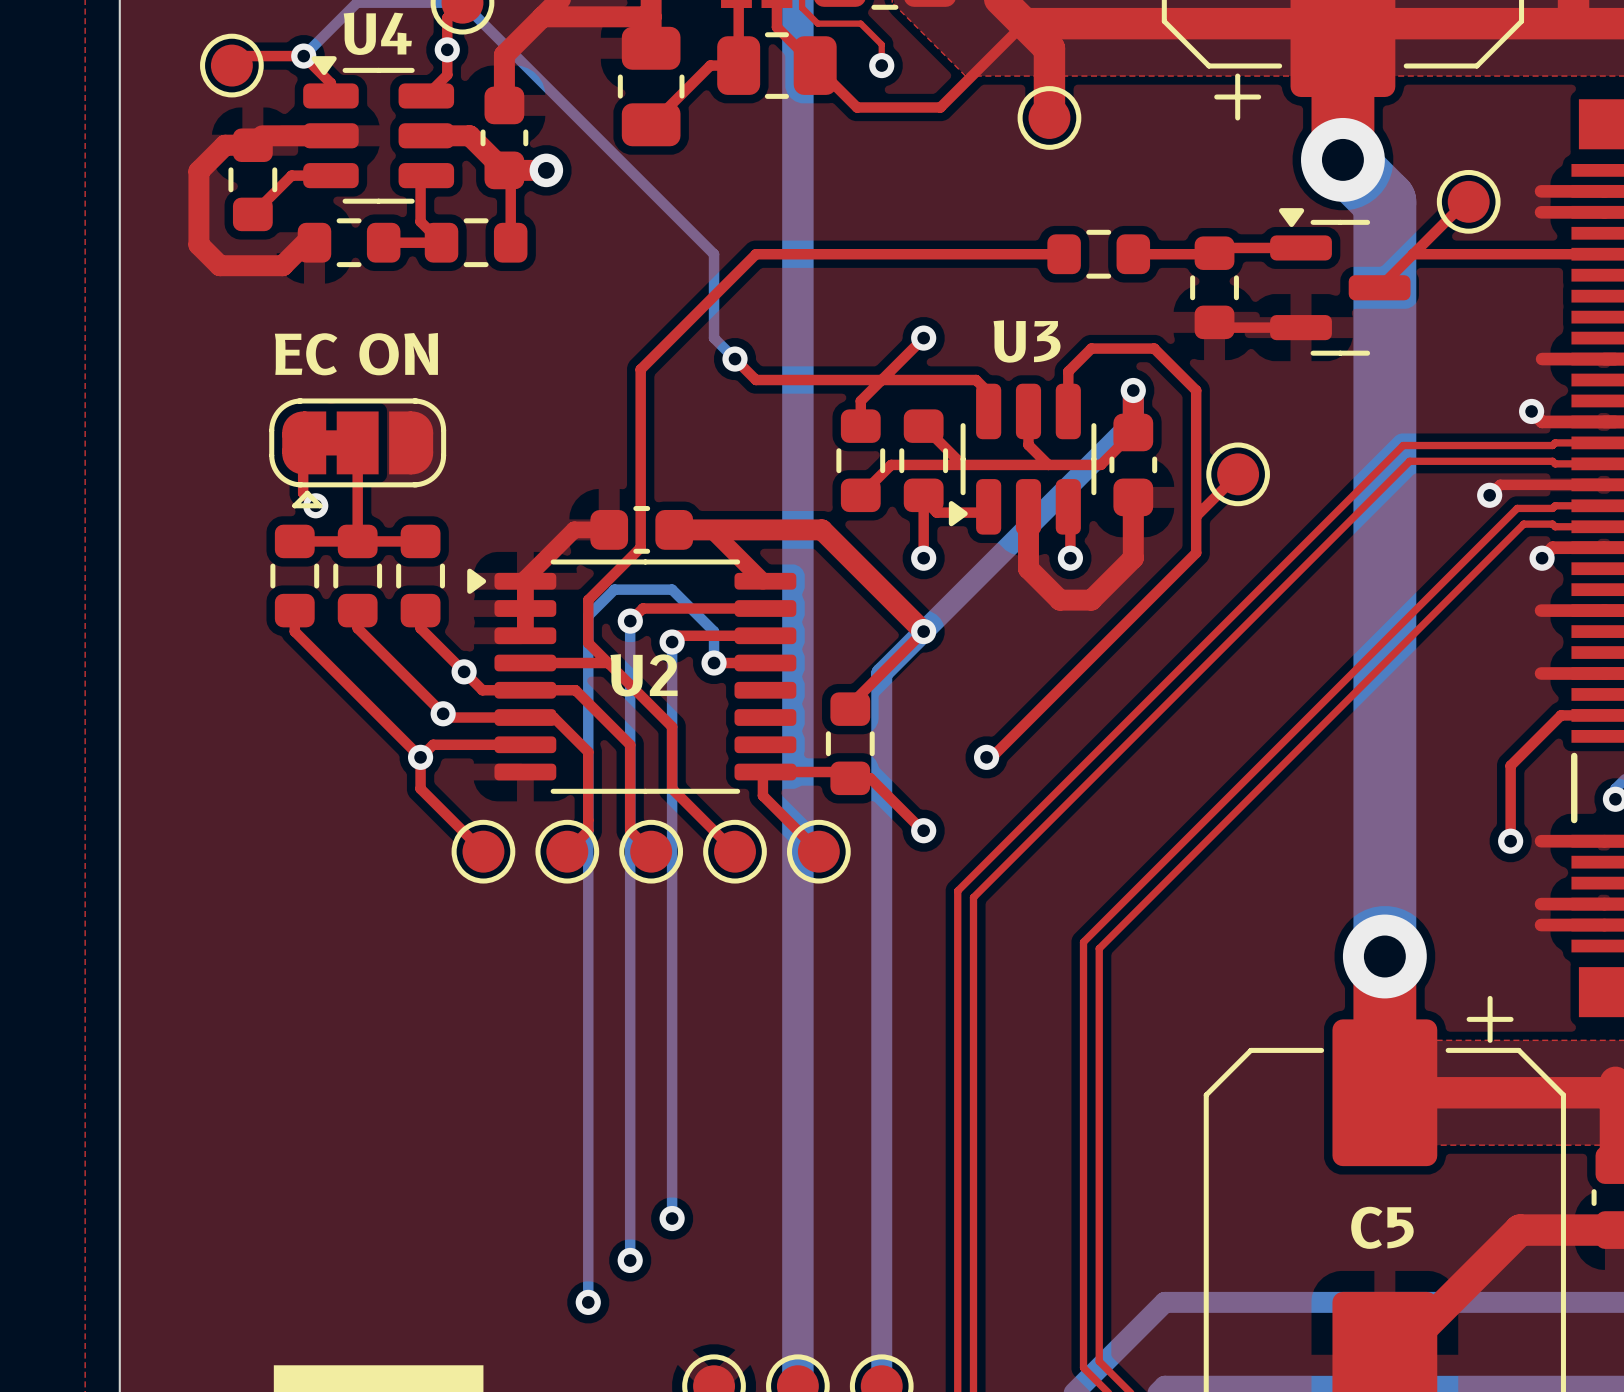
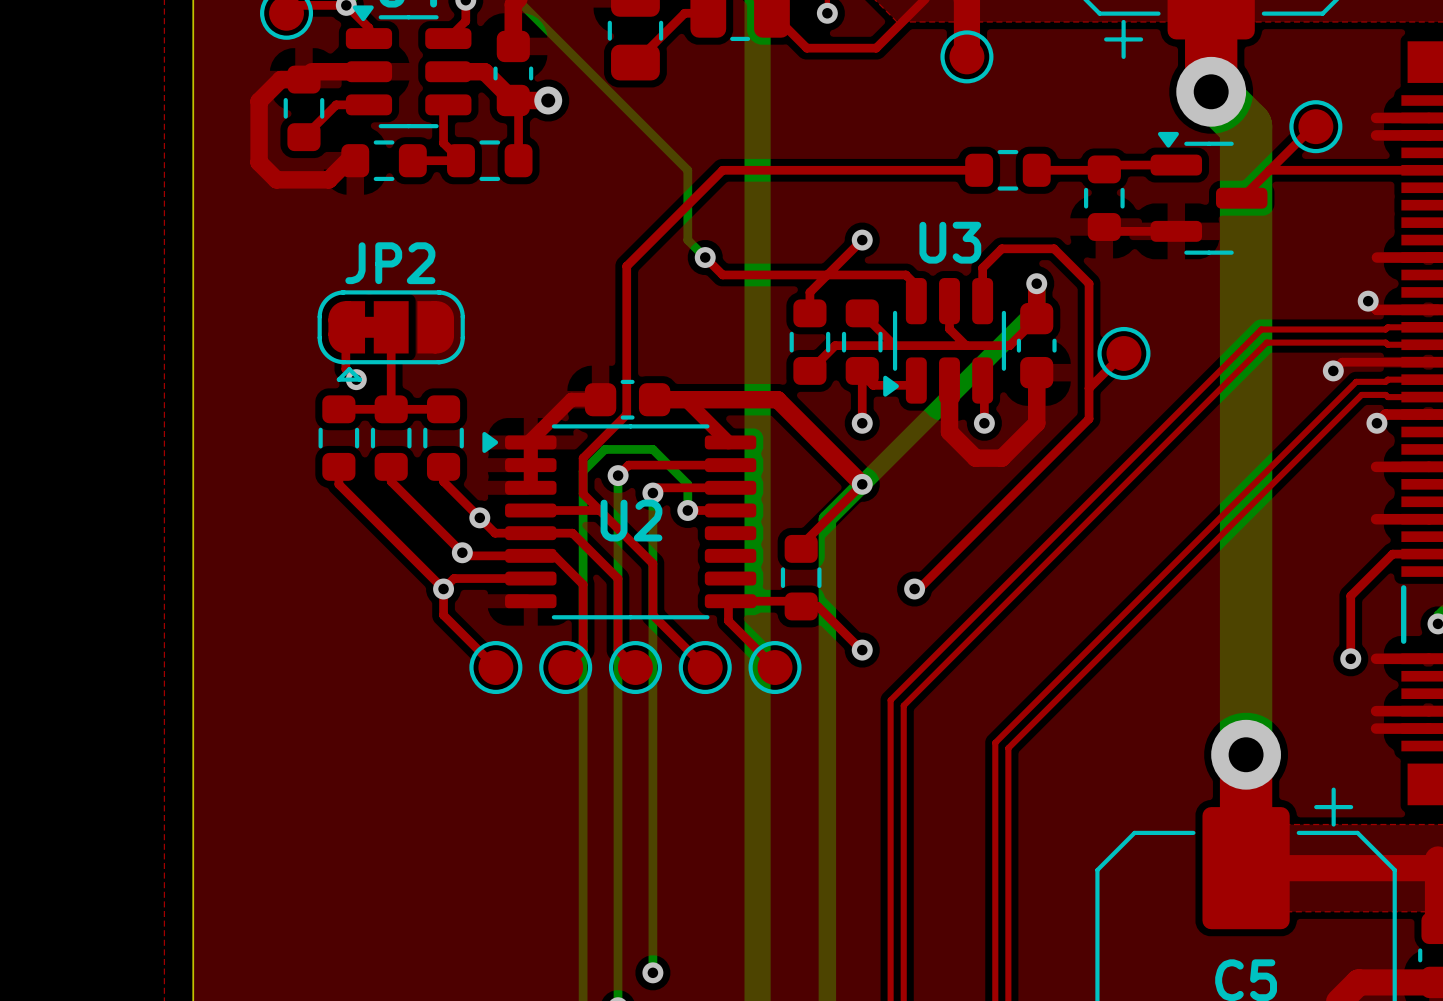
text: EC ON (356, 354) -> none
JP2 name: none -> JP2 (390, 263)

